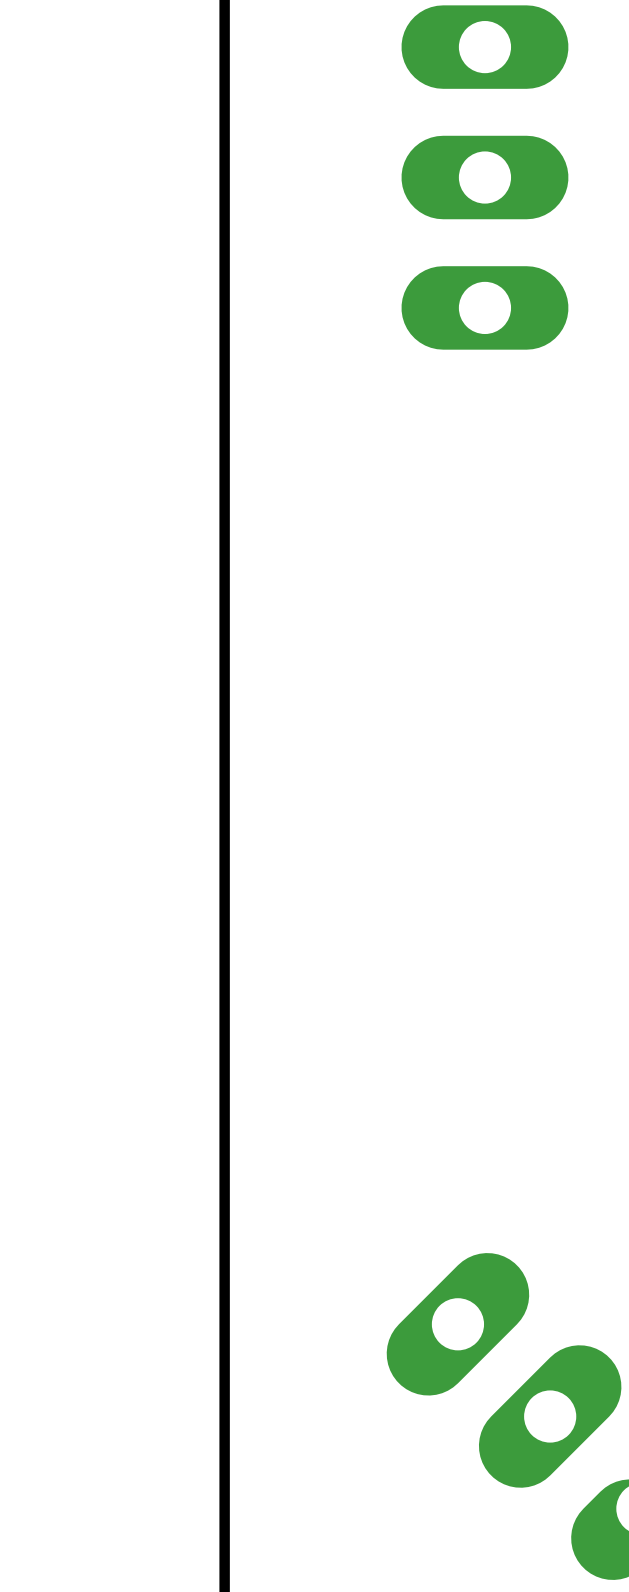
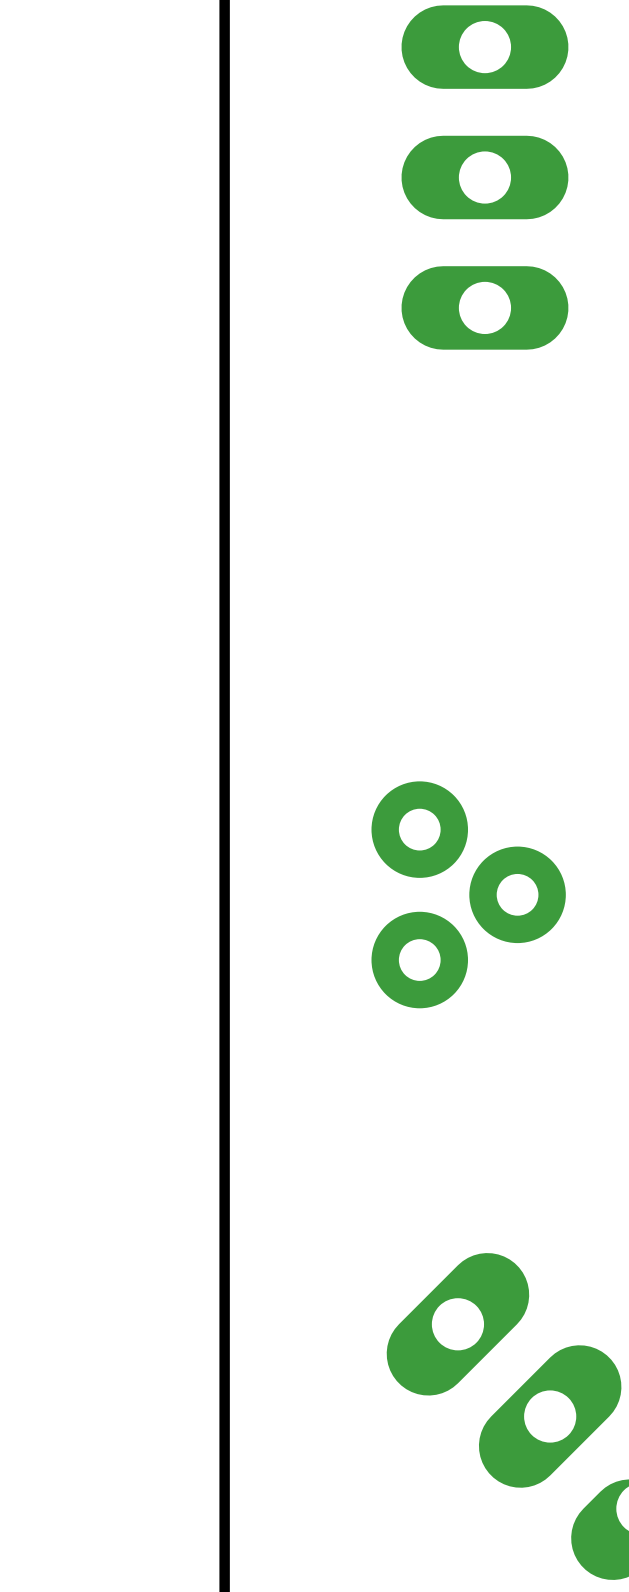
part: none -> (468, 894)

